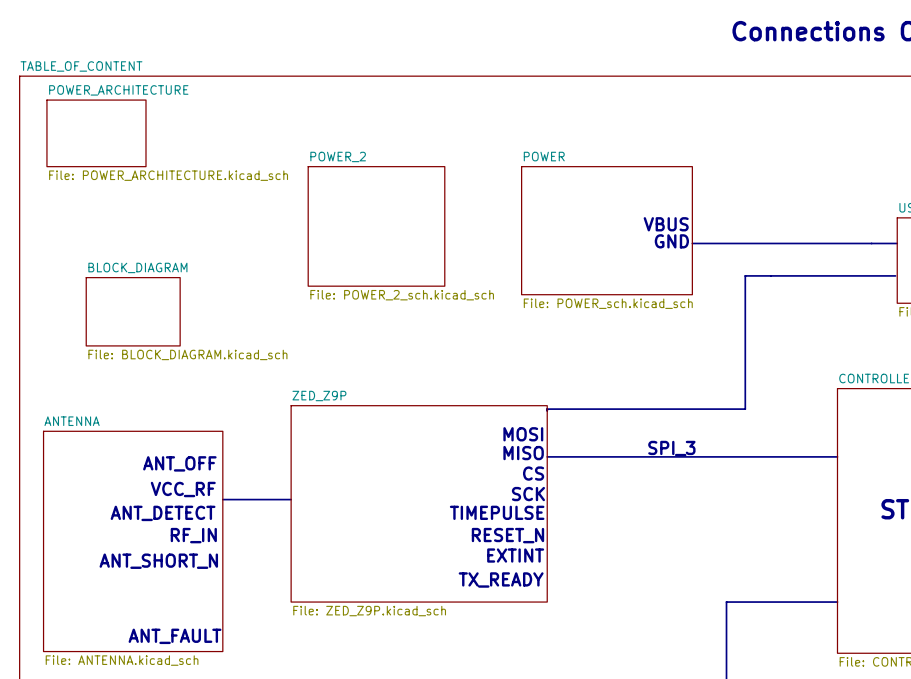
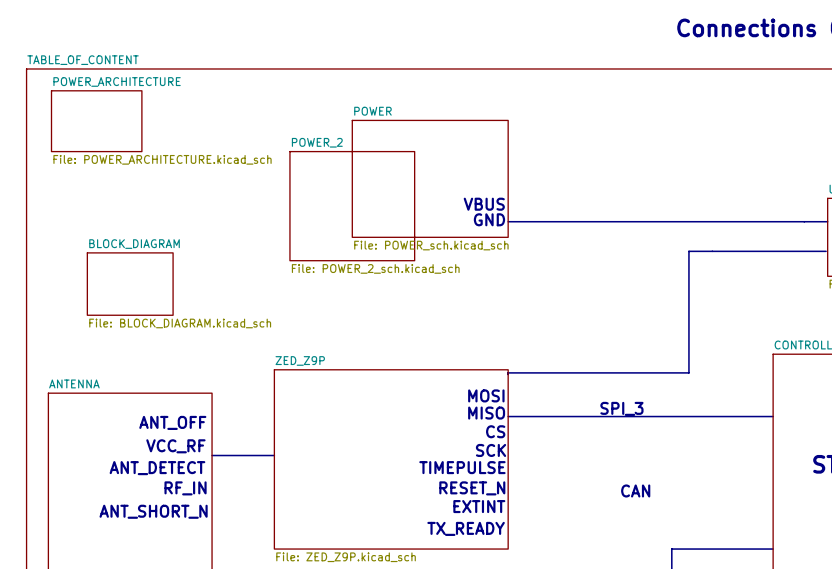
text position: VBUS (666, 224) -> VBUS (484, 204)
sheet POWER position: (606, 230) -> (430, 178)
text position: GND (671, 241) -> GND (489, 219)
line: none -> (508, 221) (640, 221)
text: none -> CAN (635, 490)

